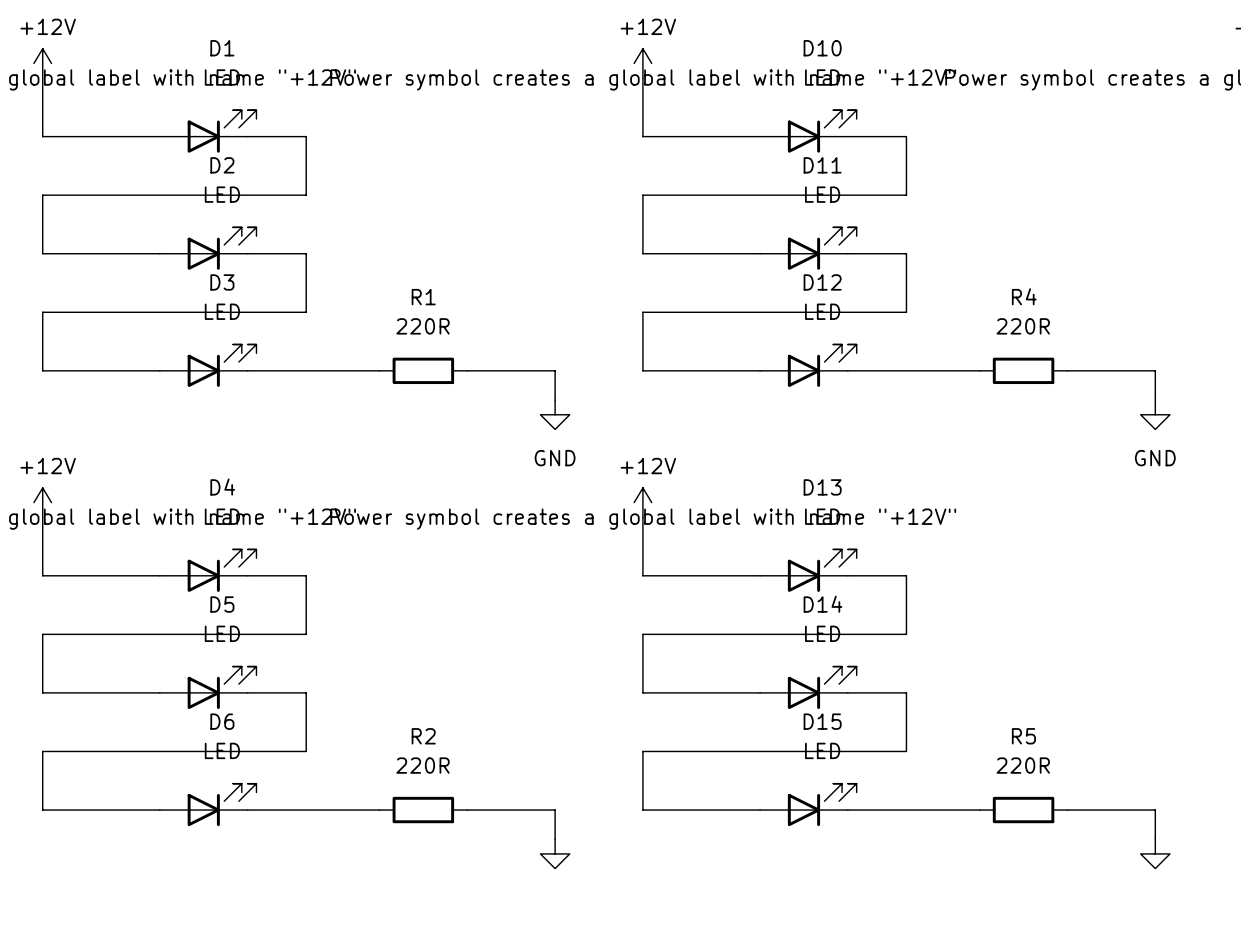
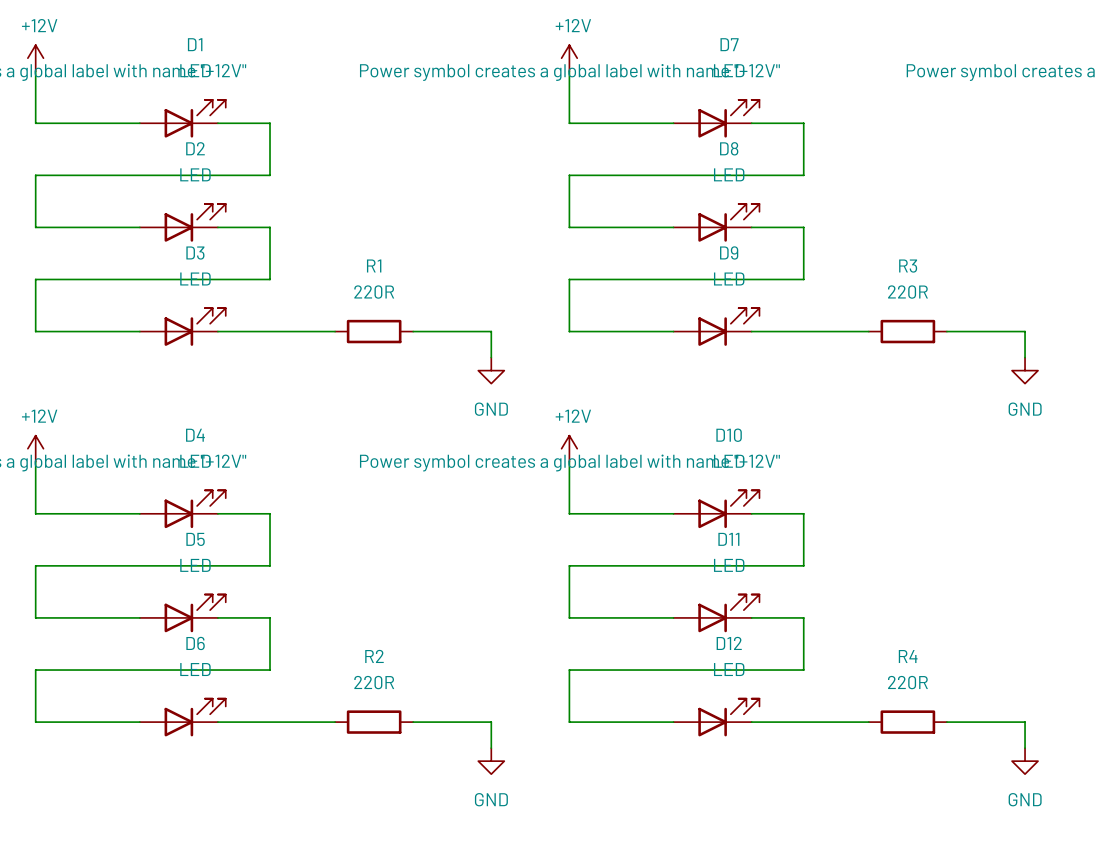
D10 name: D10 (822, 48) -> D7 (729, 44)
D11 name: D11 (822, 165) -> D8 (729, 148)
D12 name: D12 (822, 282) -> D9 (729, 252)
R4 name: R4 (1024, 296) -> R3 (908, 266)
D13 name: D13 (822, 487) -> D10 (729, 435)
D14 name: D14 (822, 604) -> D11 (728, 539)
D15 name: D15 (822, 721) -> D12 (729, 643)
R5 name: R5 (1023, 736) -> R4 (908, 656)
power symbol text: none -> GND (491, 799)
power symbol text: none -> GND (1025, 799)

